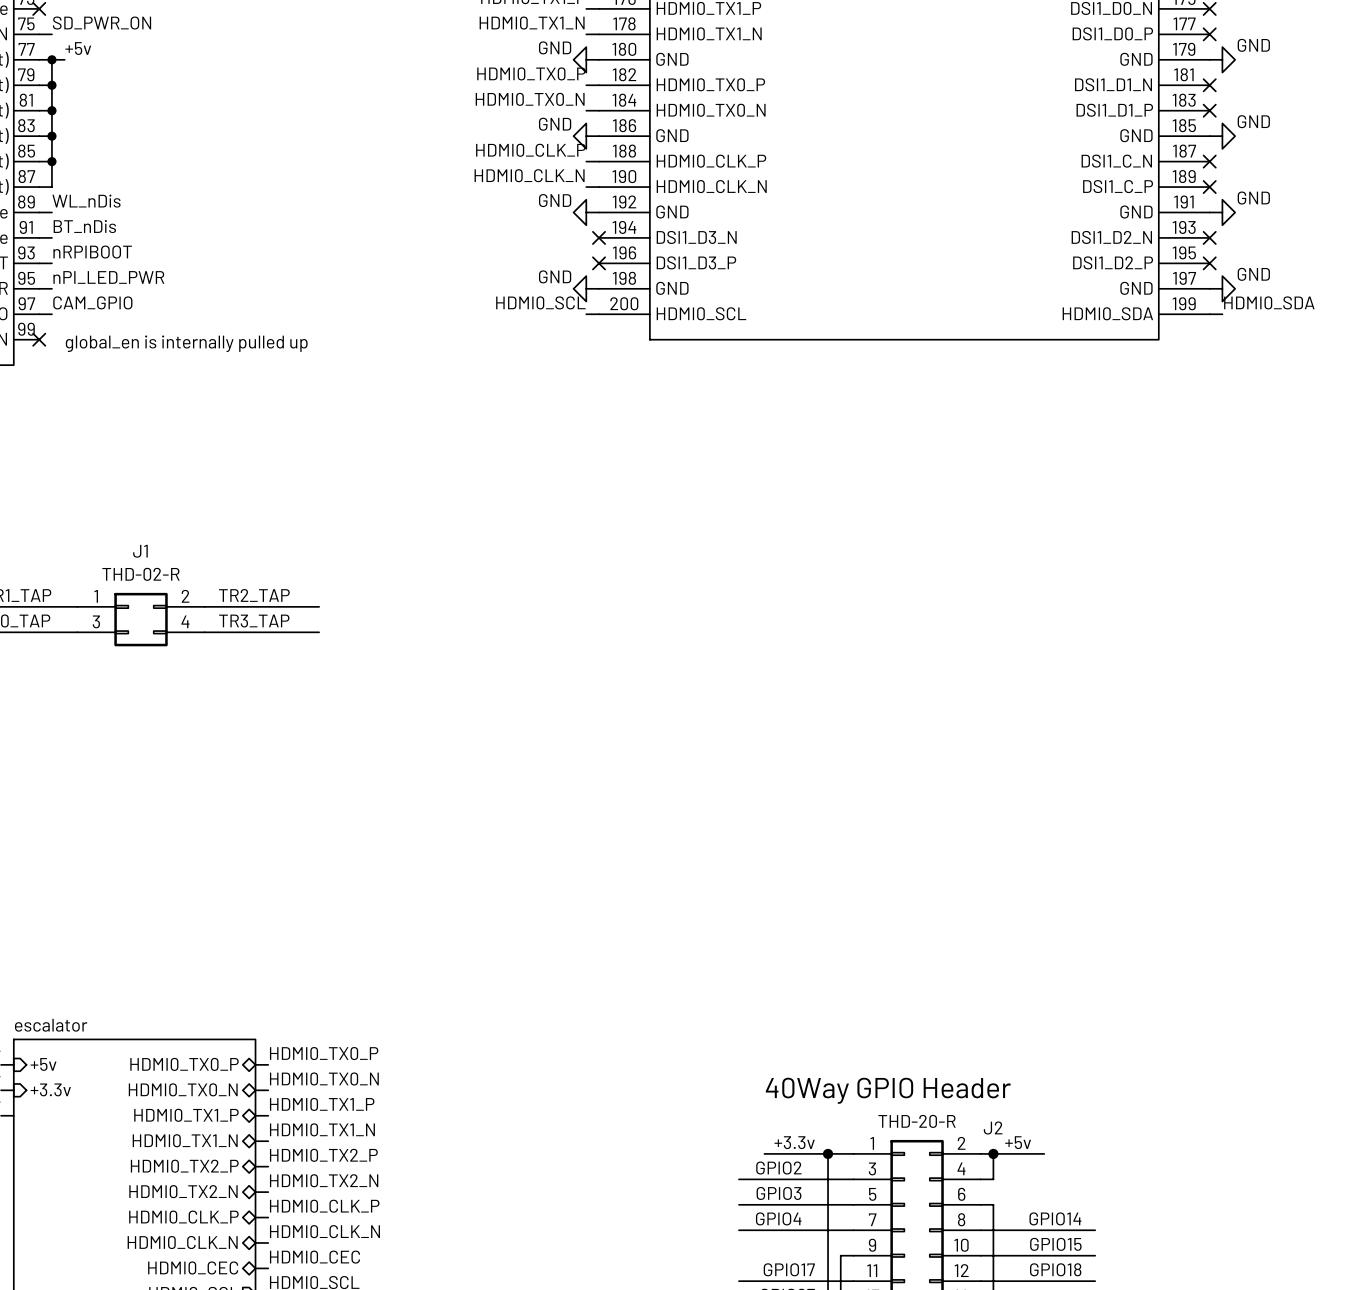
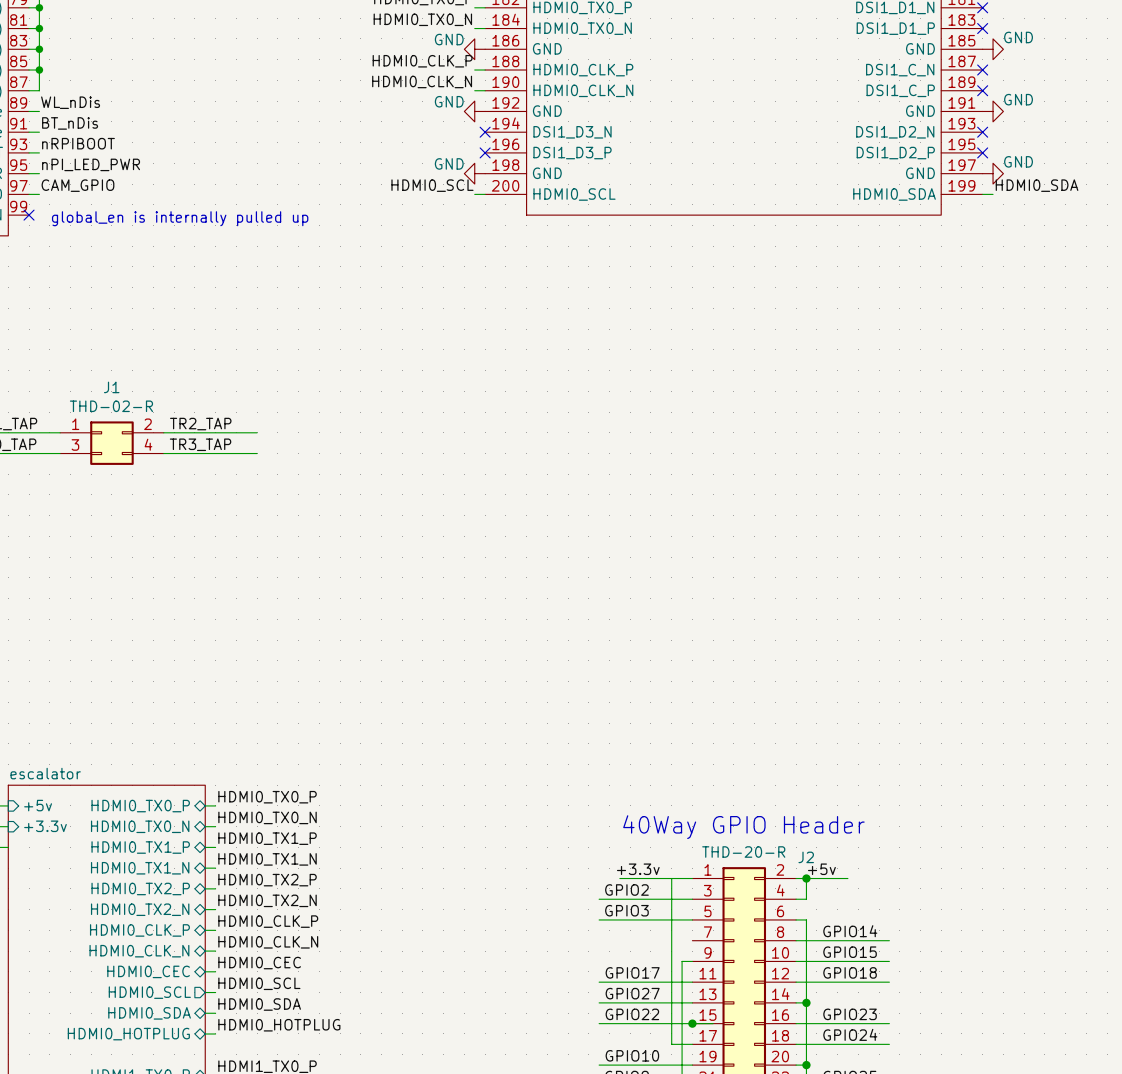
junction: (828, 1153) -> none
label: GPIO4 (778, 1218) -> none
wire: (738, 1230) (853, 1230) -> none

